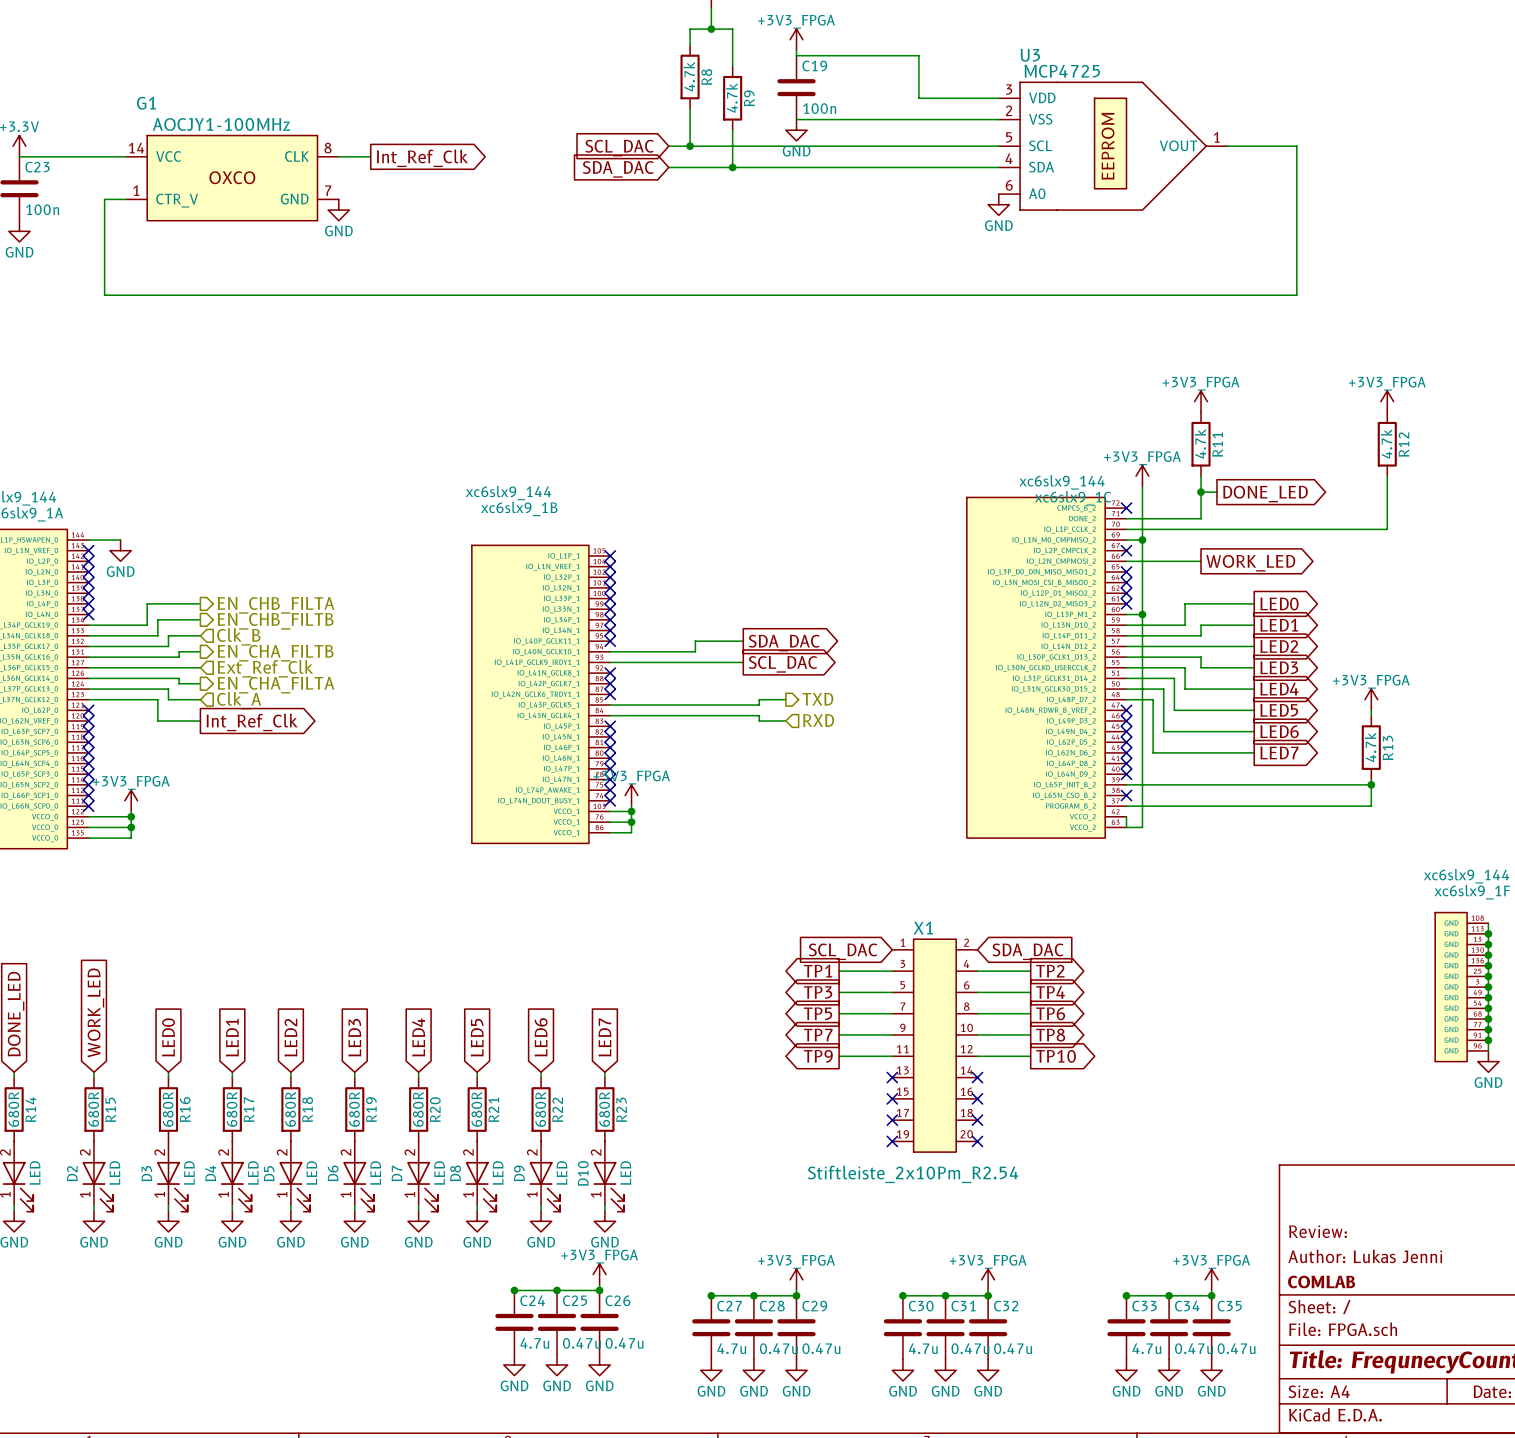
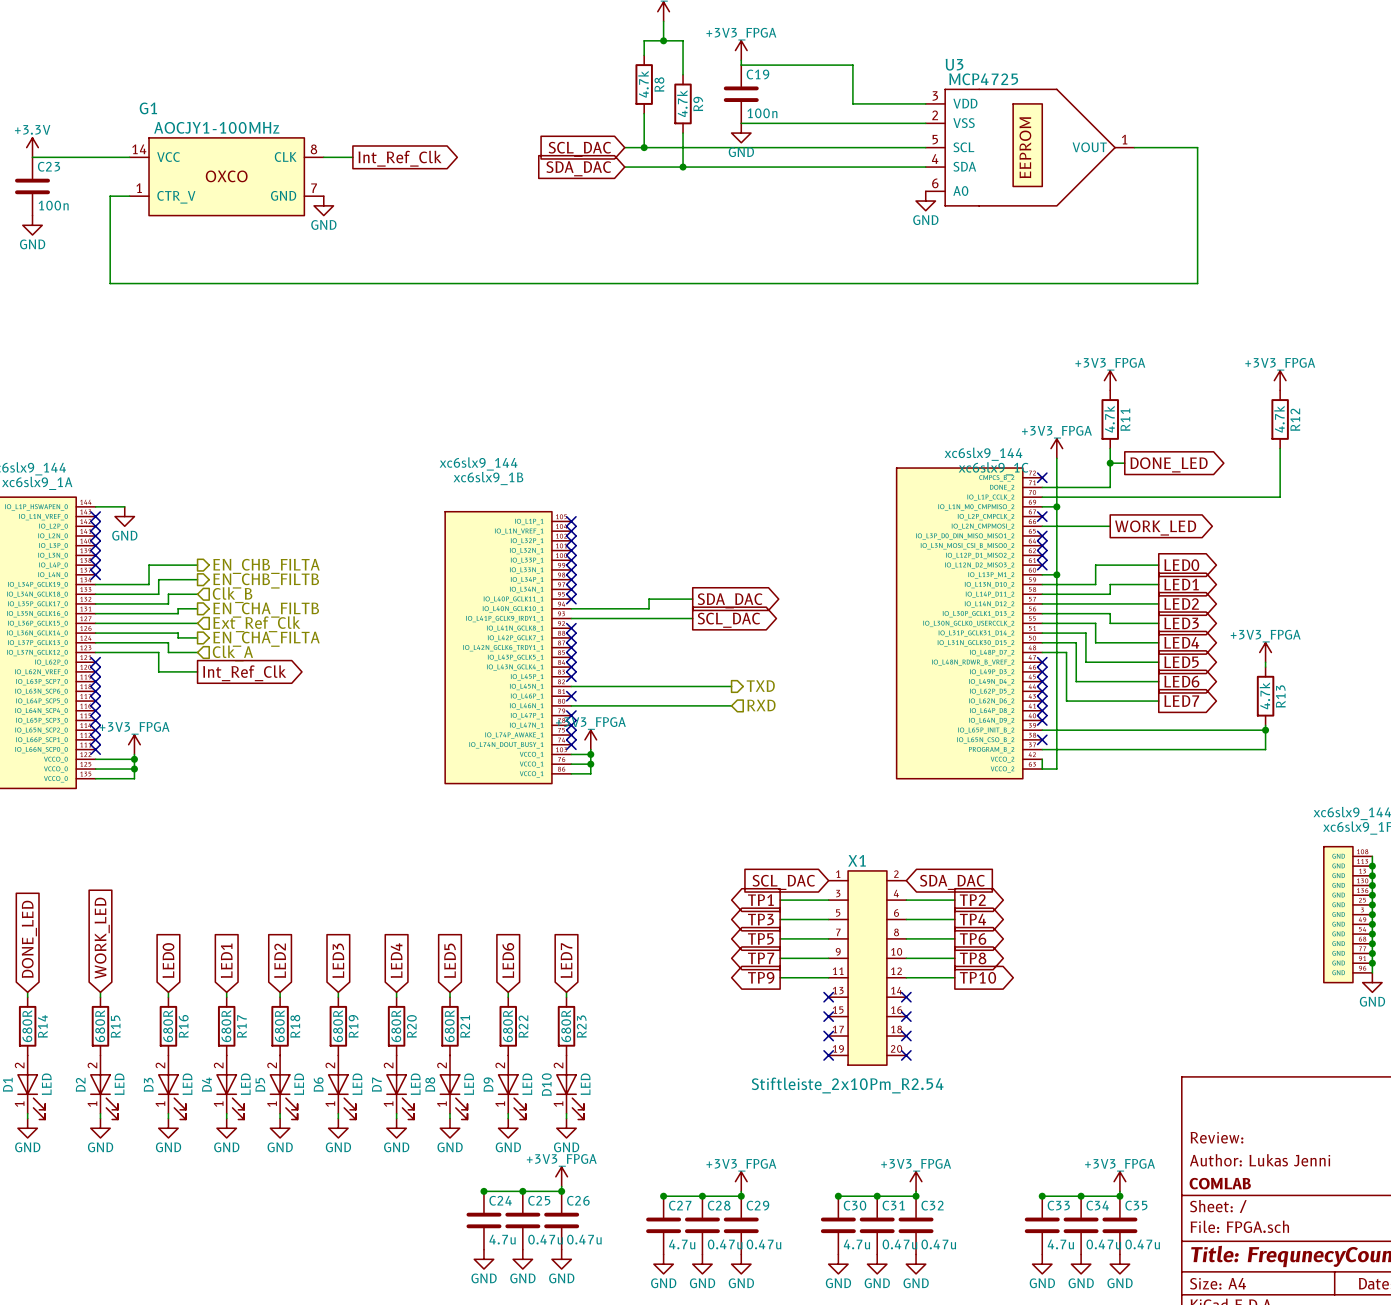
wire: (785, 699) (759, 699) (759, 705) (610, 705) -> none
hierarchical label position: TXD (817, 699) -> TXD (760, 686)
no-connect mark: none -> (571, 657)
wire: (610, 715) (759, 715) (759, 720) (785, 720) -> none
no-connect mark: none -> (571, 667)
hierarchical label position: RXD (818, 720) -> RXD (761, 705)
wire: none -> (571, 686) (731, 686)
no-connect mark: (610, 736) -> none
wire: none -> (571, 705) (731, 705)
no-connect mark: (610, 758) -> none

